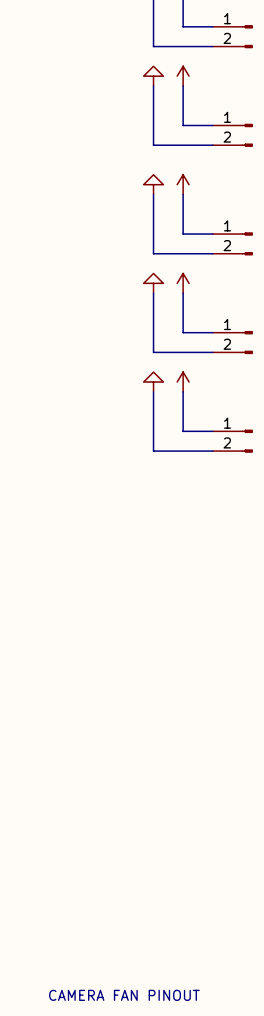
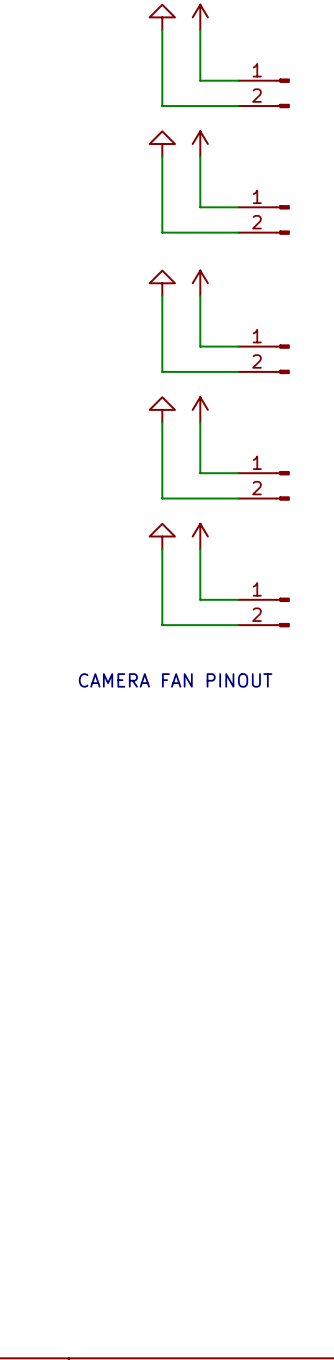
text: none -> CAMERA FAN PINOUT (175, 680)
text: CAMERA FAN PINOUT (124, 995) -> none

